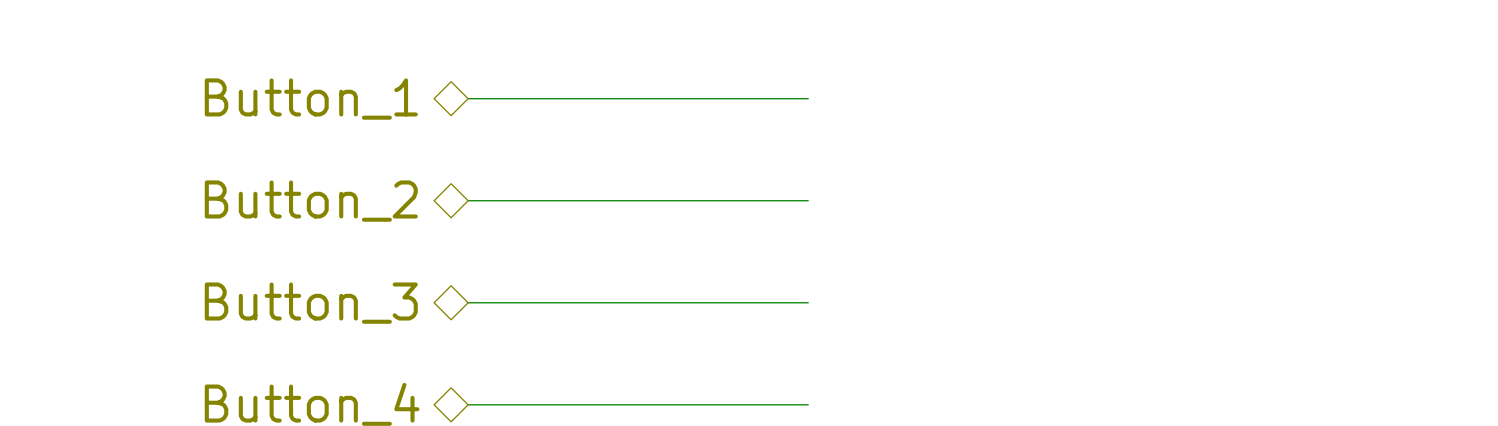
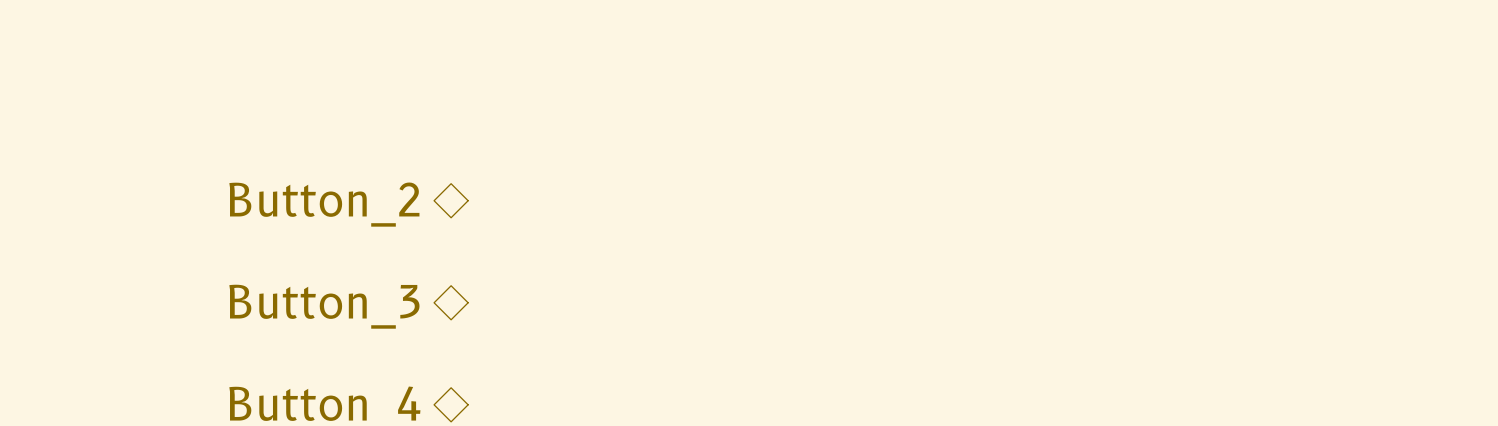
wire: (468, 98) (808, 98) -> none
hierarchical label: Button_1 (311, 99) -> none
wire: (468, 200) (808, 200) -> none
wire: (468, 302) (808, 302) -> none
wire: (468, 404) (808, 404) -> none

